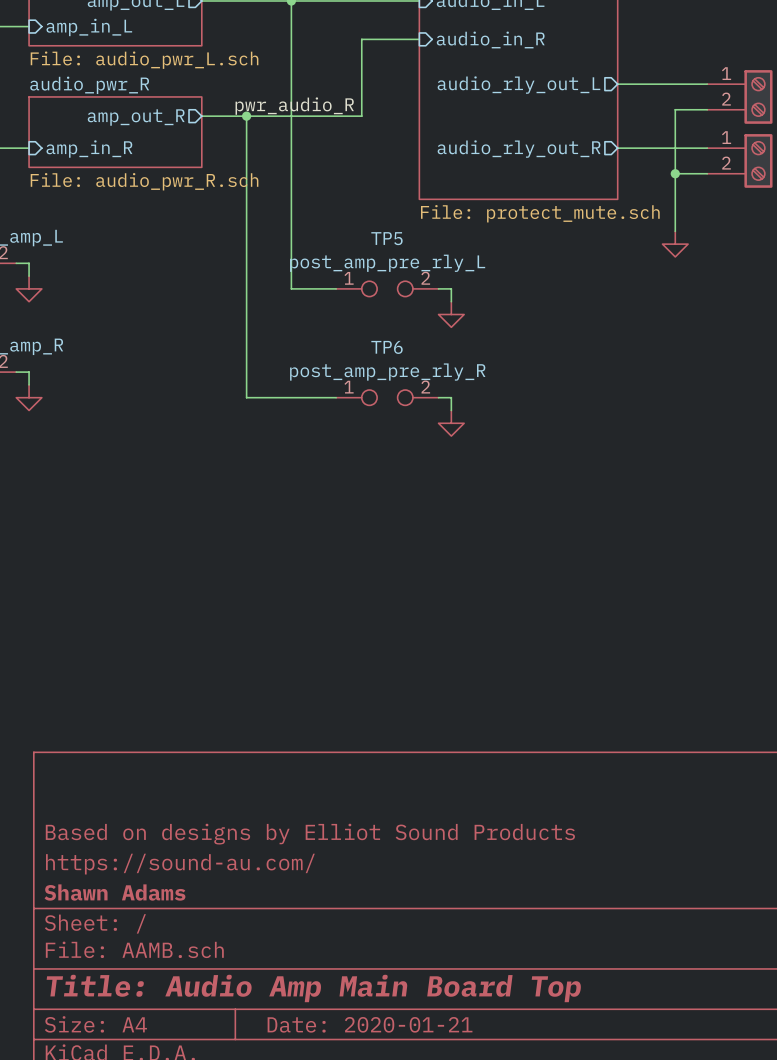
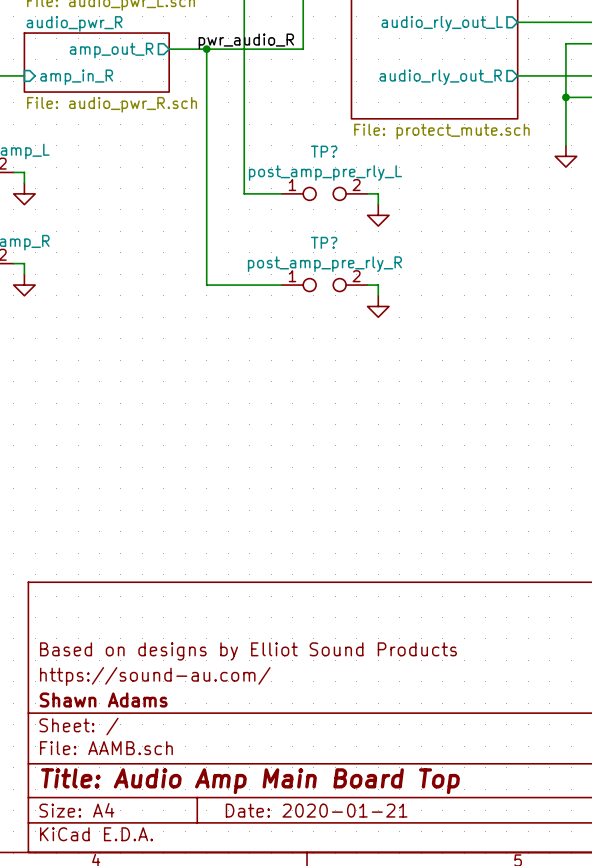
TP5 name: TP5 (386, 238) -> TP? (324, 151)
TP6 name: TP6 (387, 347) -> TP? (324, 242)

